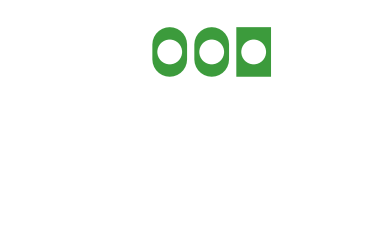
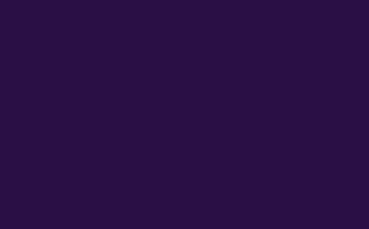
part: (211, 51) -> none

